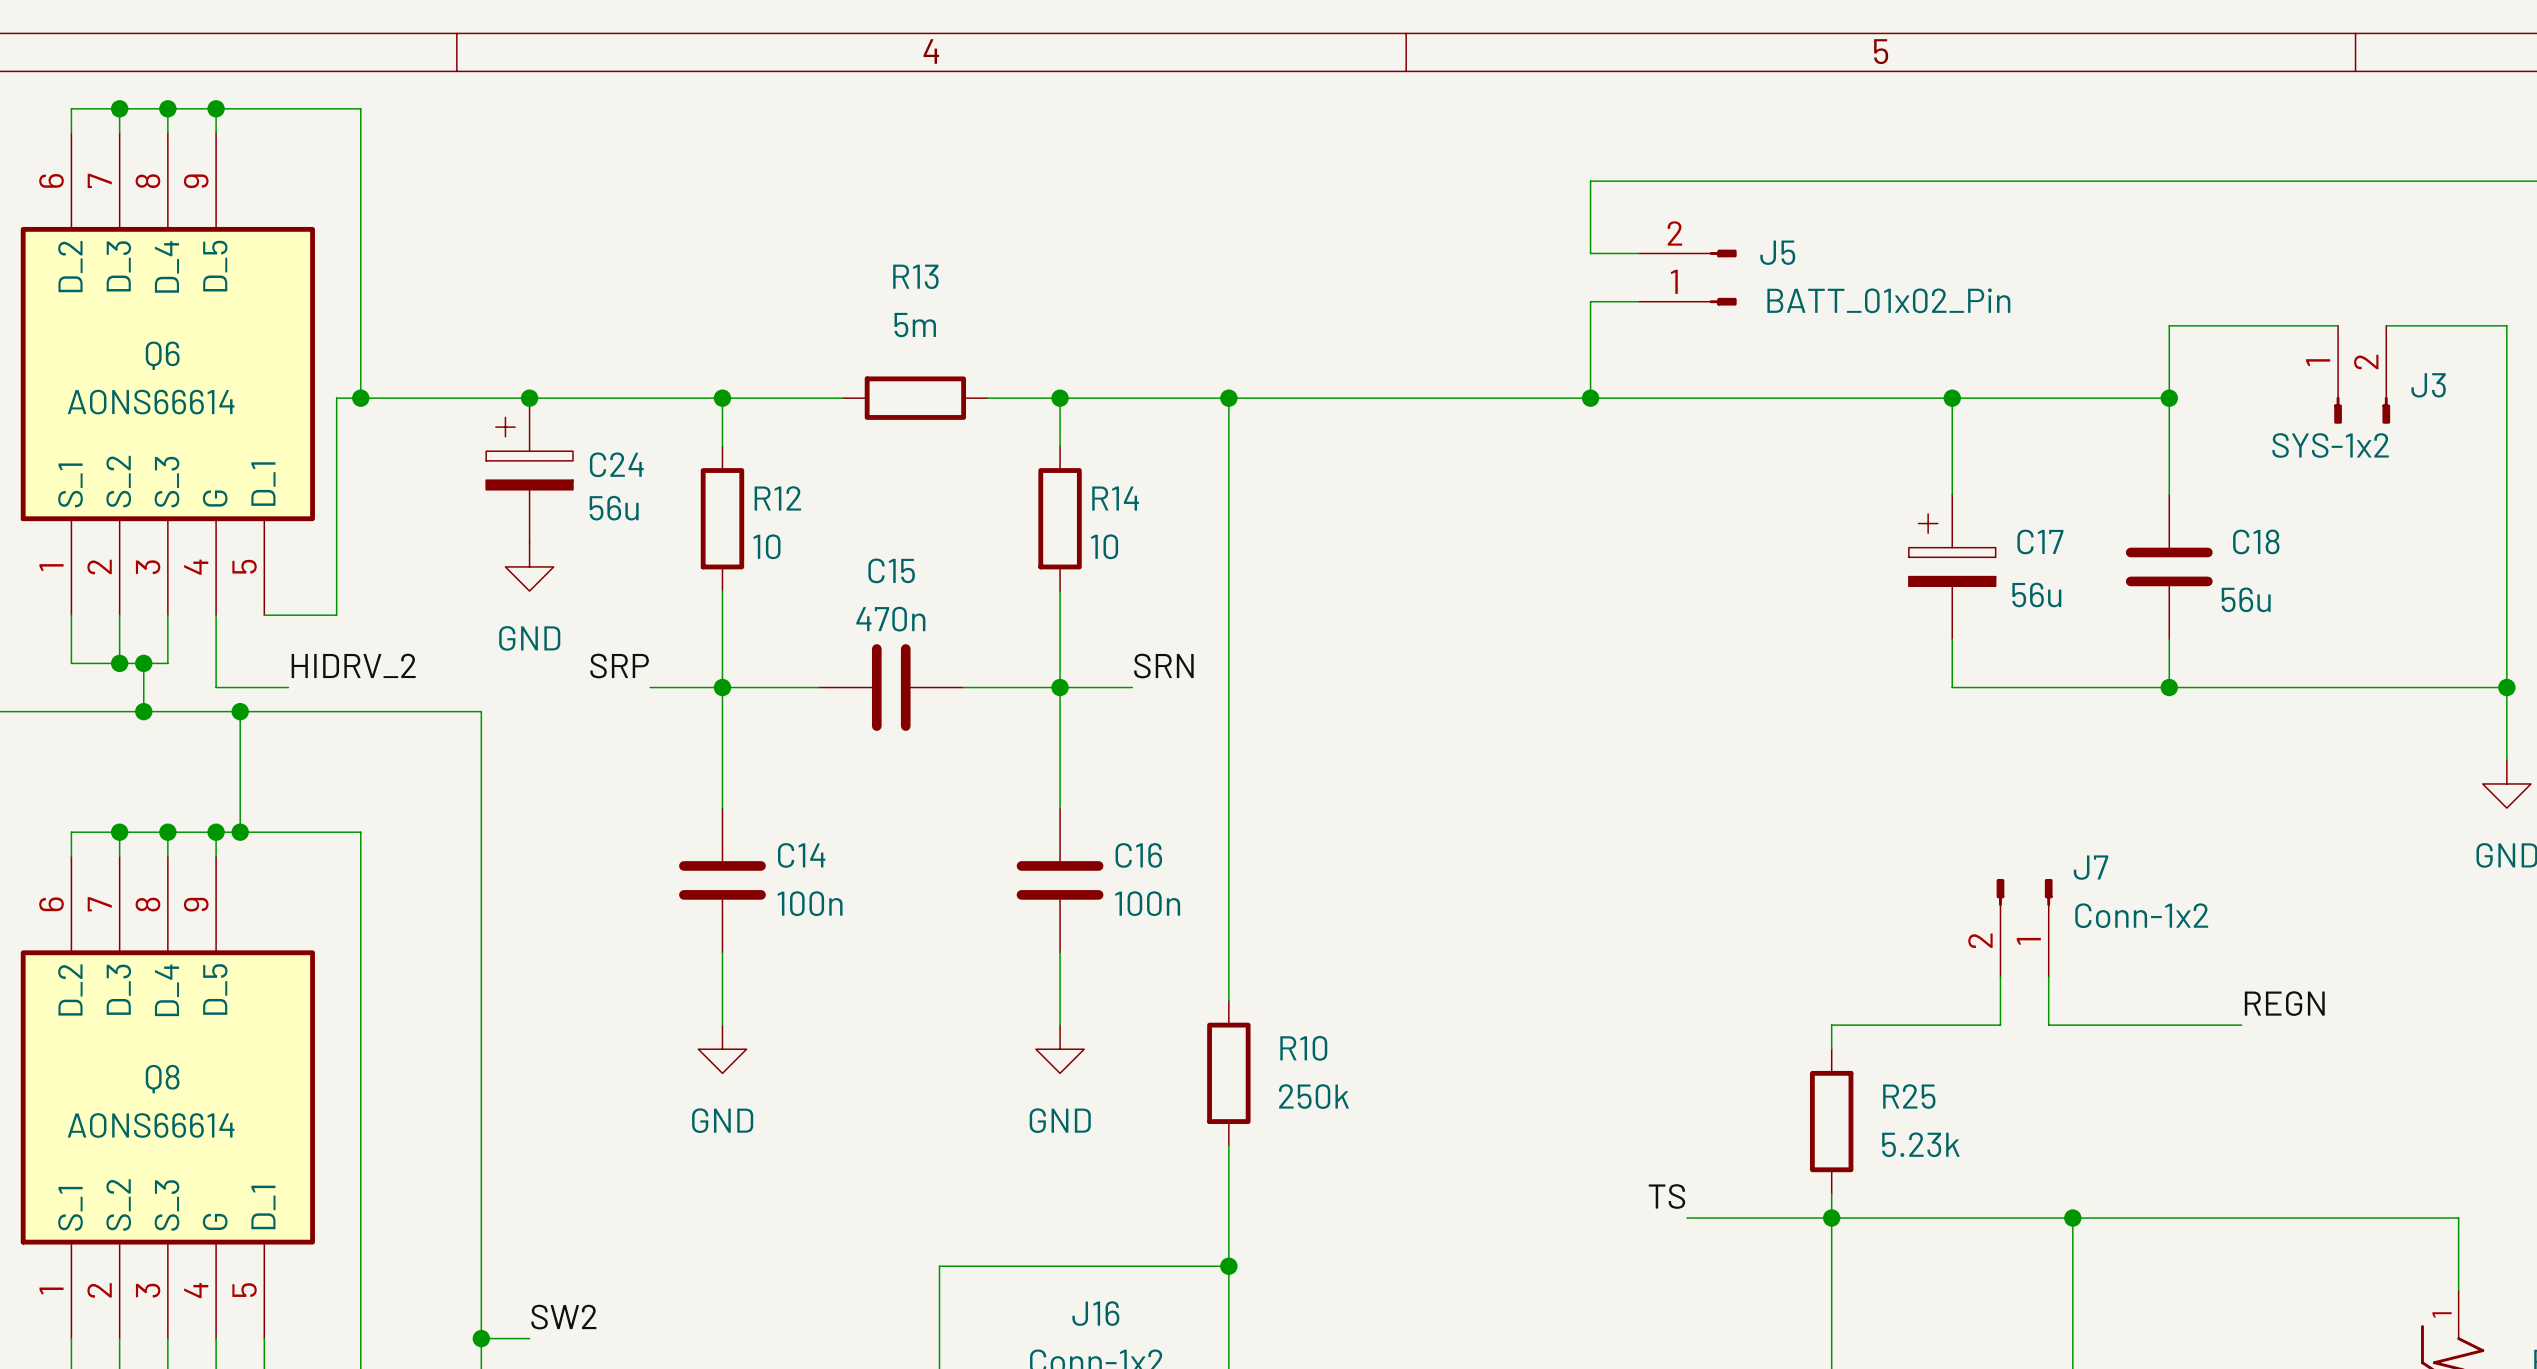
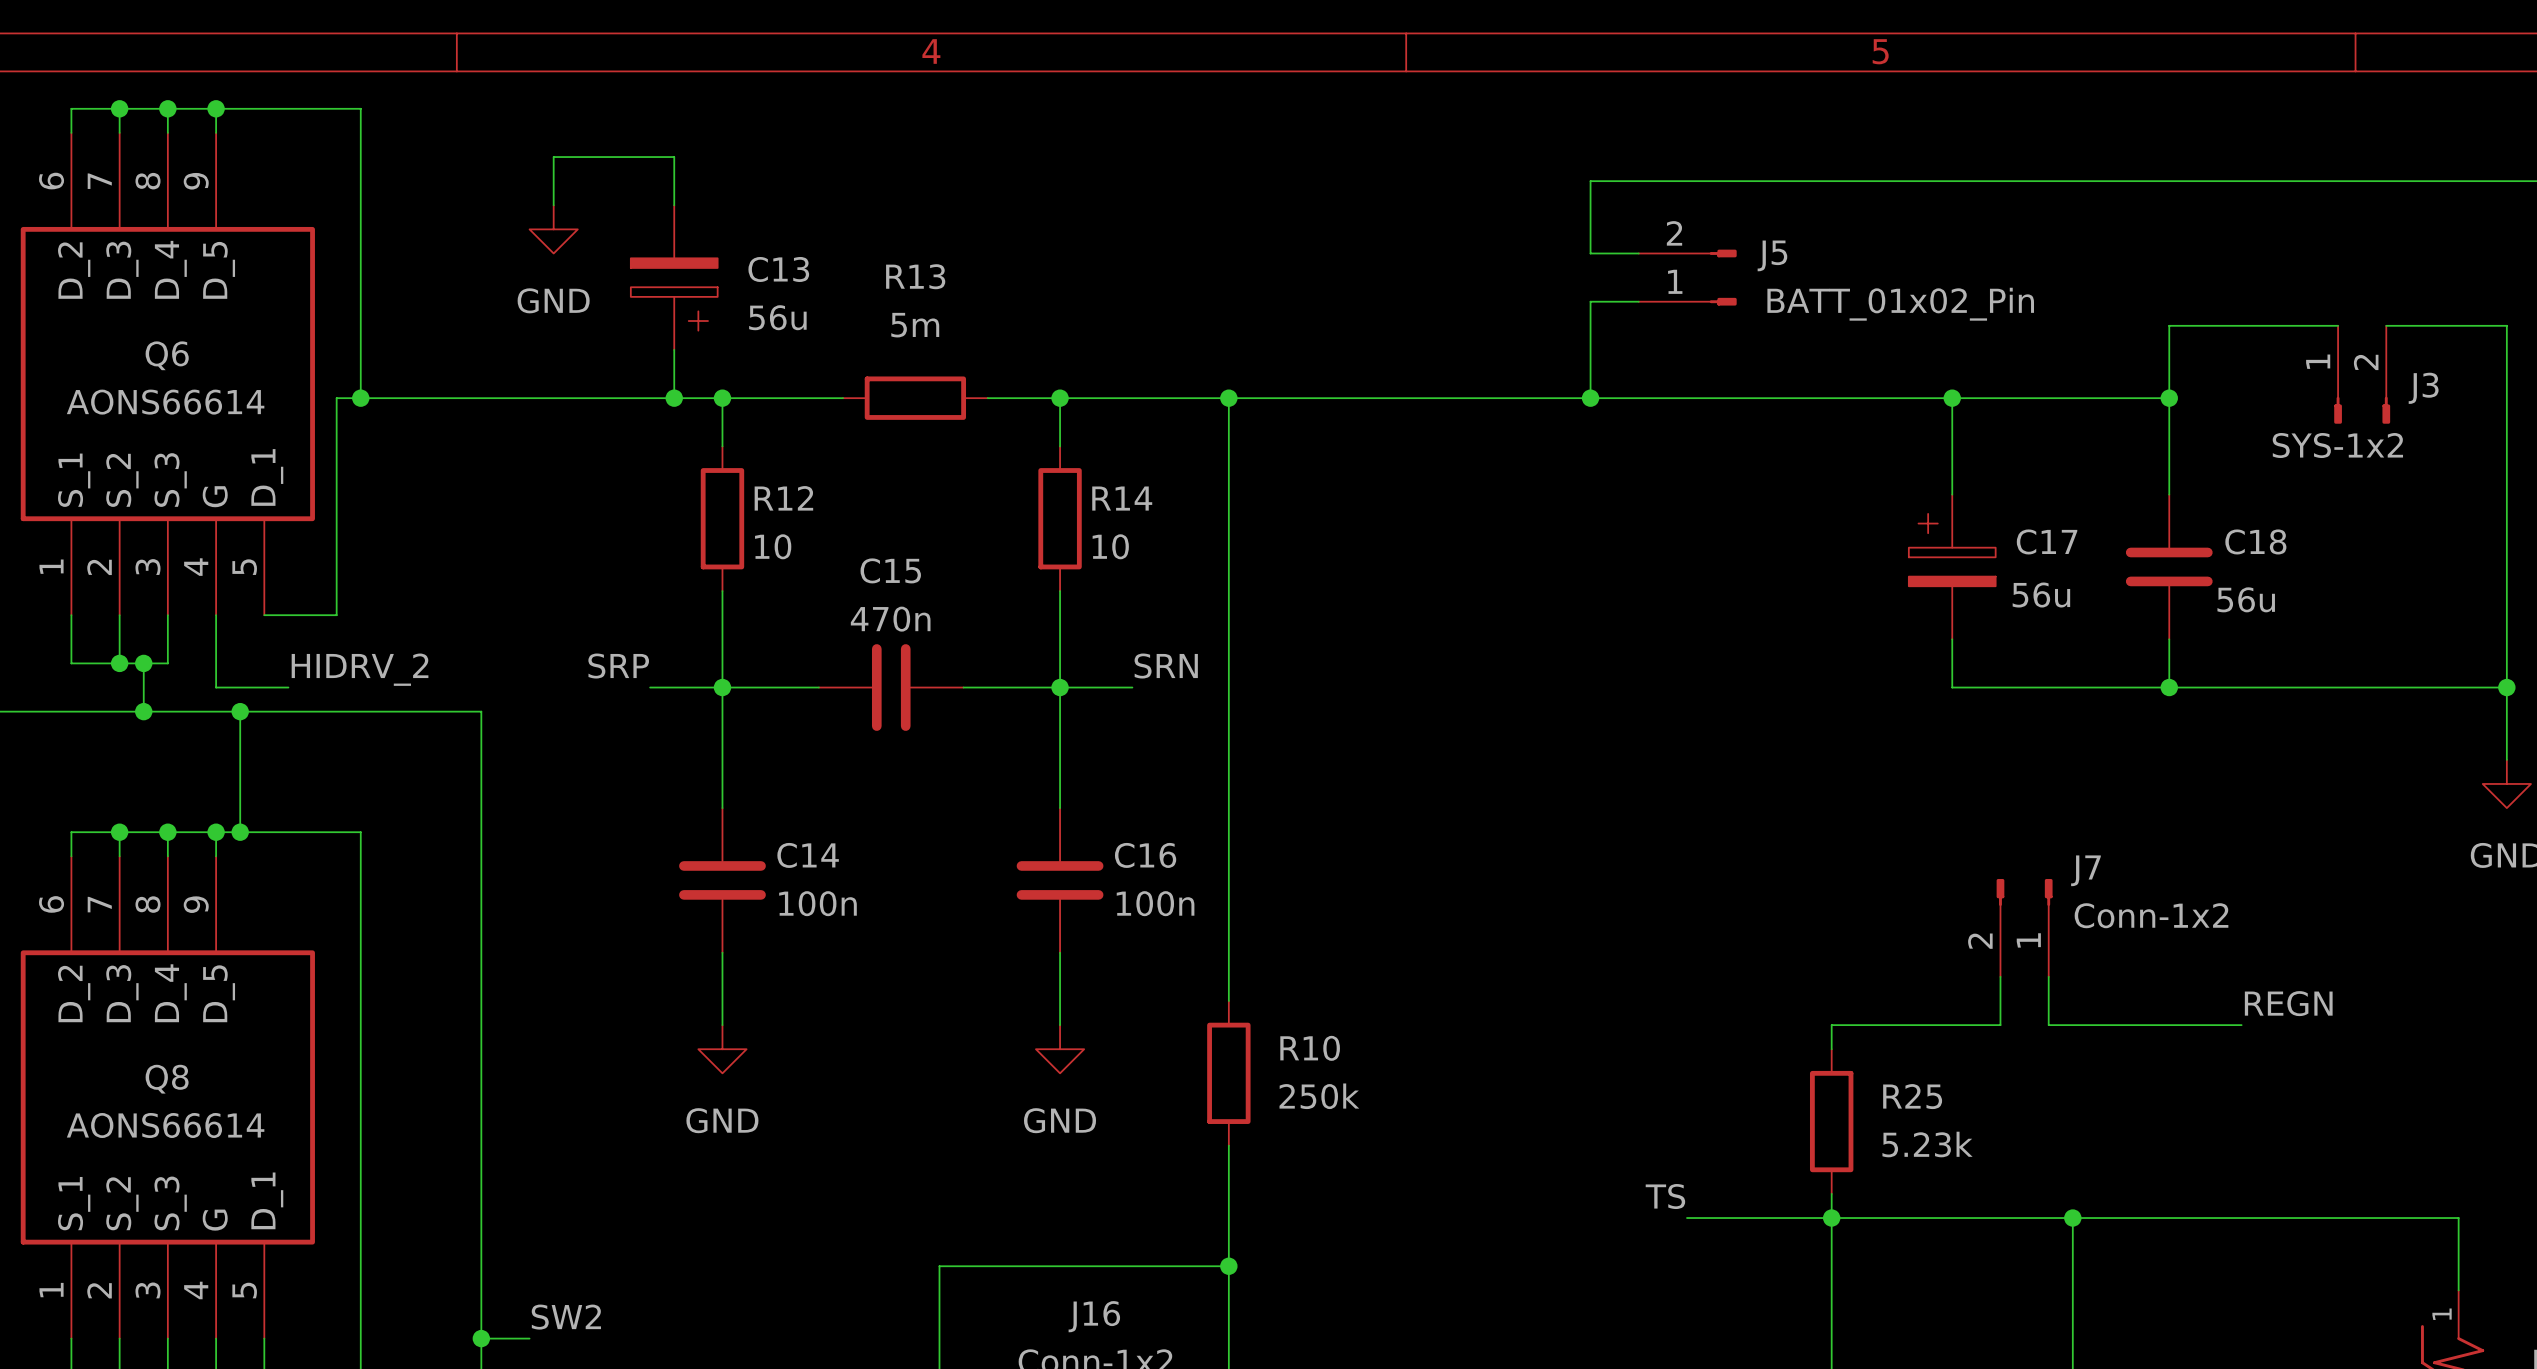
wire: none -> (553, 205) (553, 157) (674, 157) (674, 205)
C13: none -> 56u (674, 277)
wire: none -> (674, 349) (674, 398)
junction: (529, 398) -> none
junction: none -> (674, 398)
C24: 56u (529, 470) -> none
power symbol position: GND (529, 566) -> GND (553, 229)

